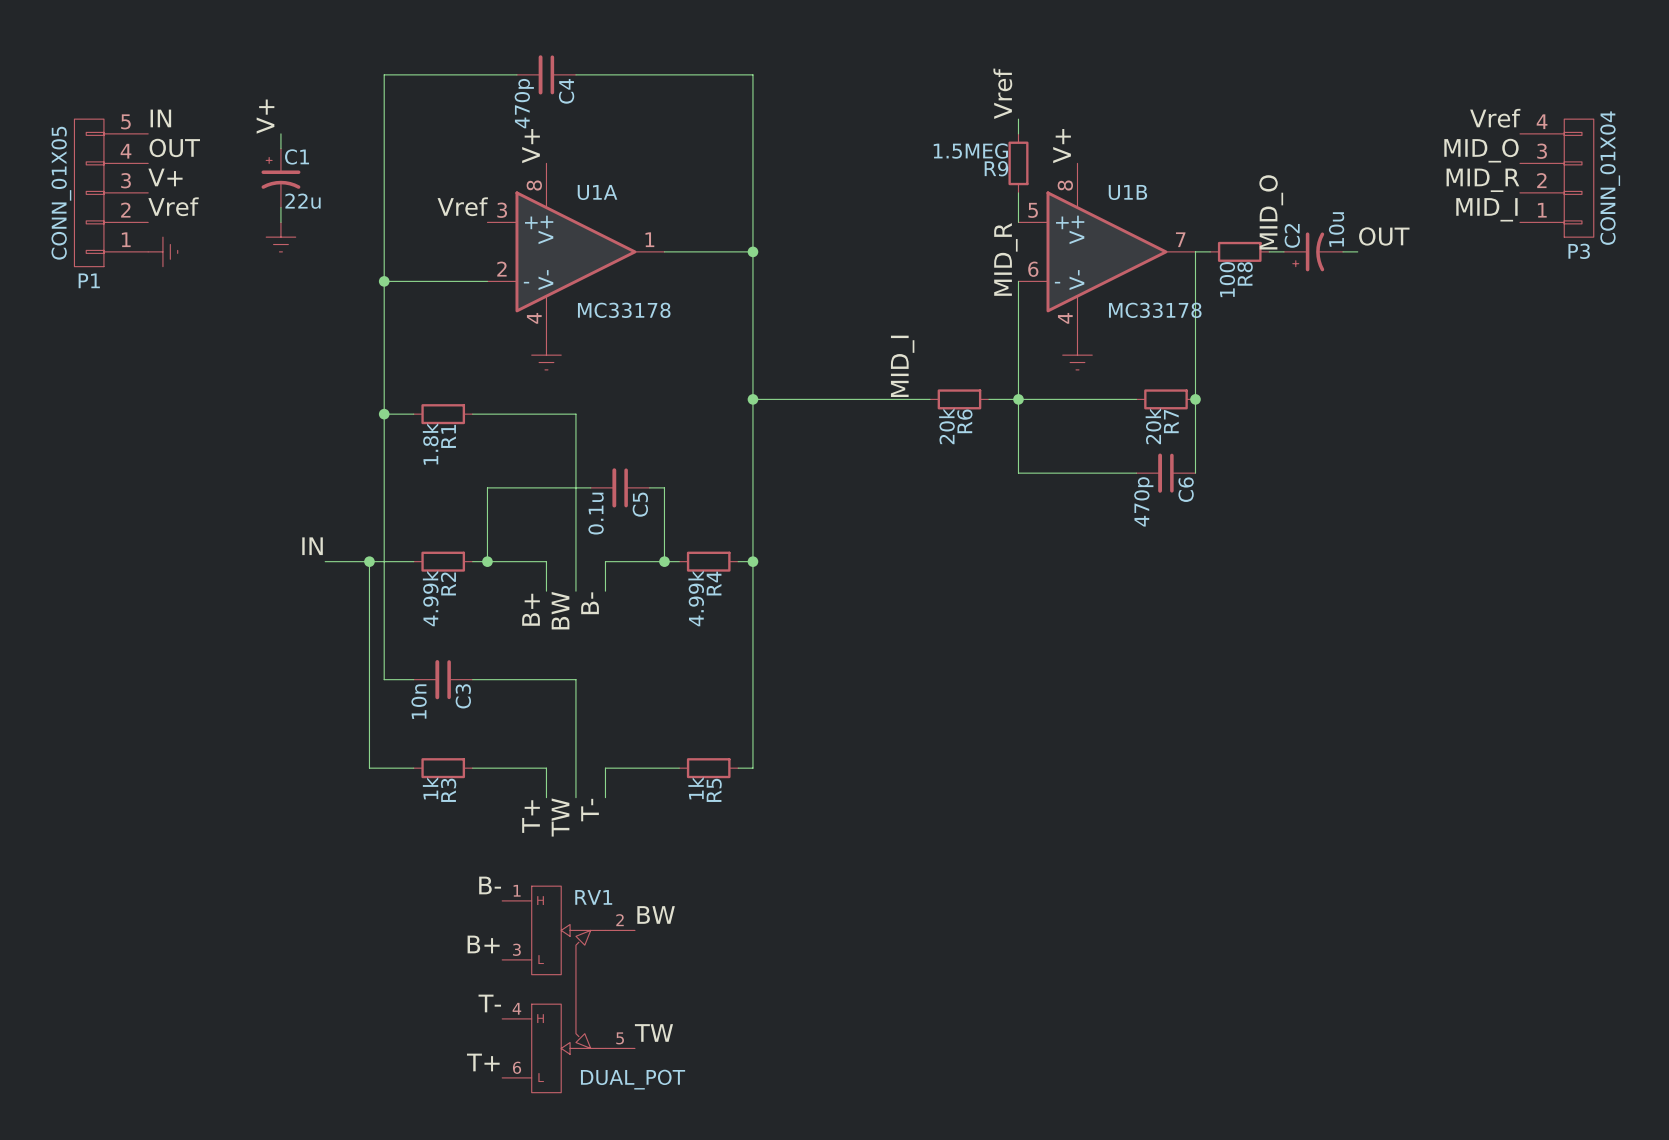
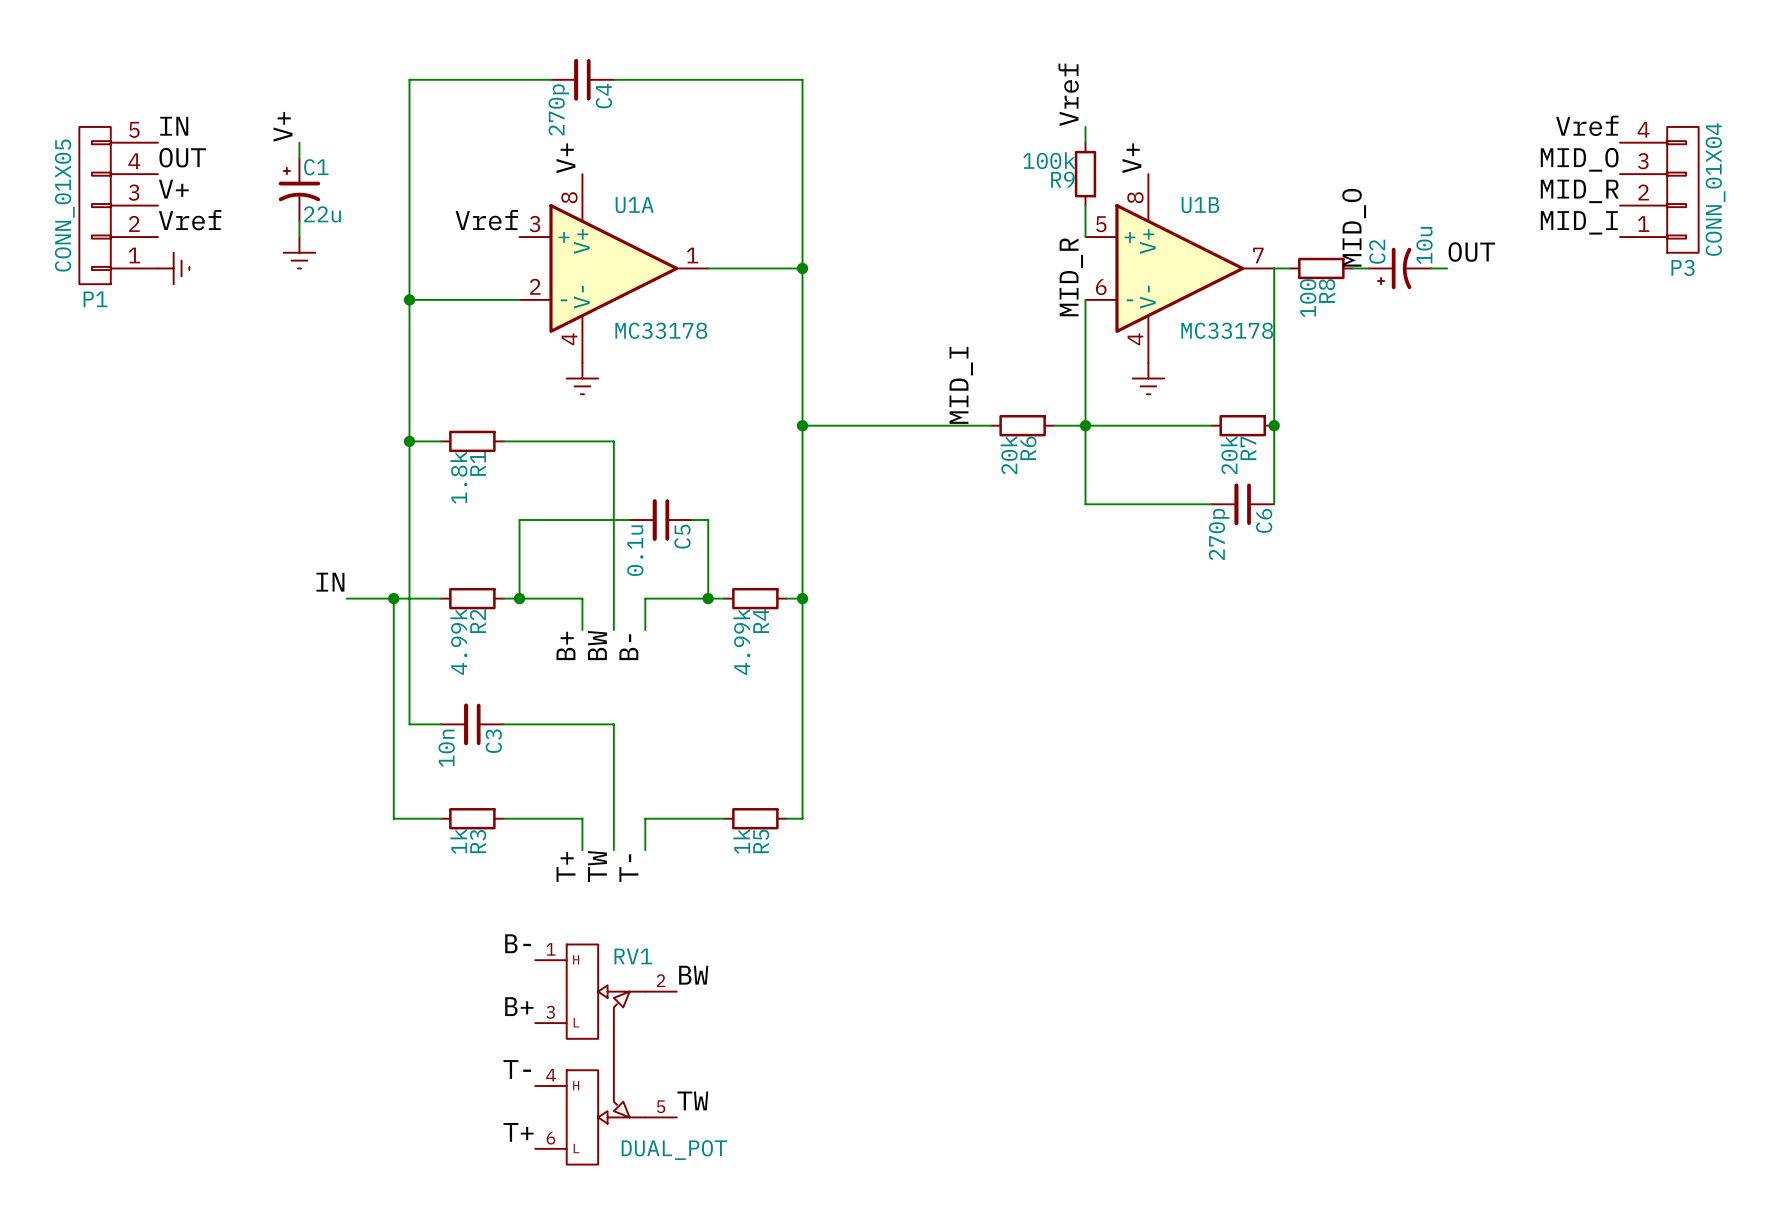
C4 value: 470p (524, 103) -> 270p (558, 109)
R9 value: 1.5MEG (970, 151) -> 100k (1049, 160)
C6 value: 470p (1143, 501) -> 270p (1219, 534)

